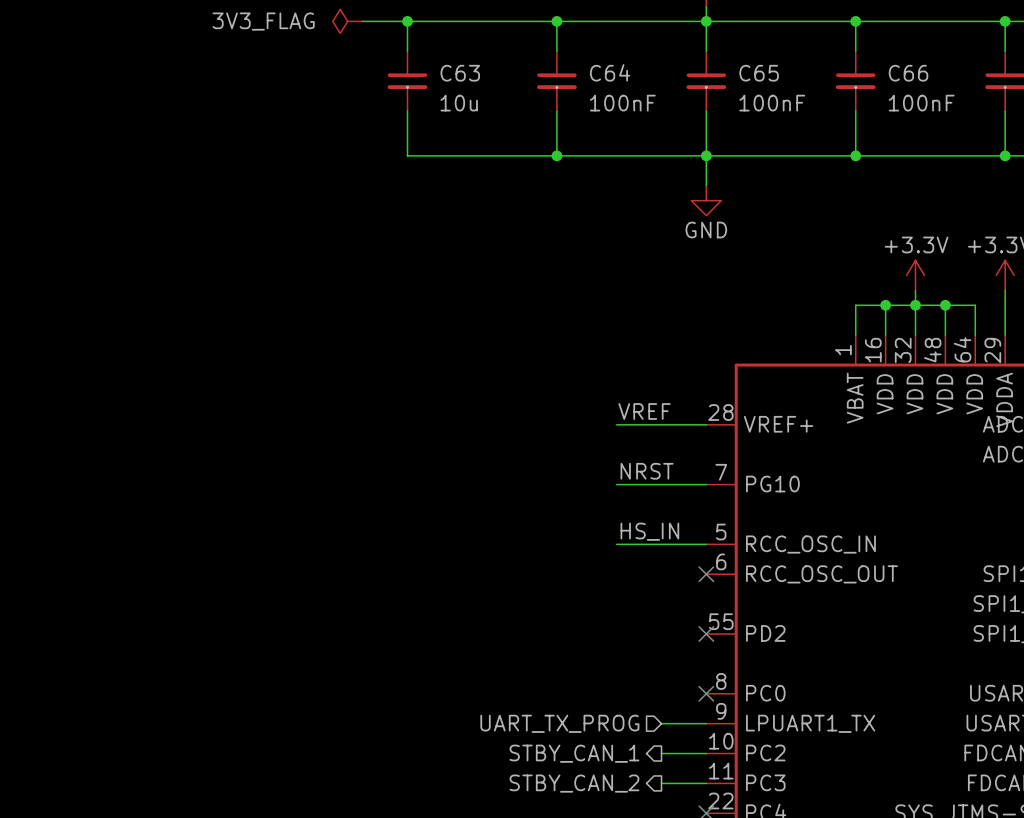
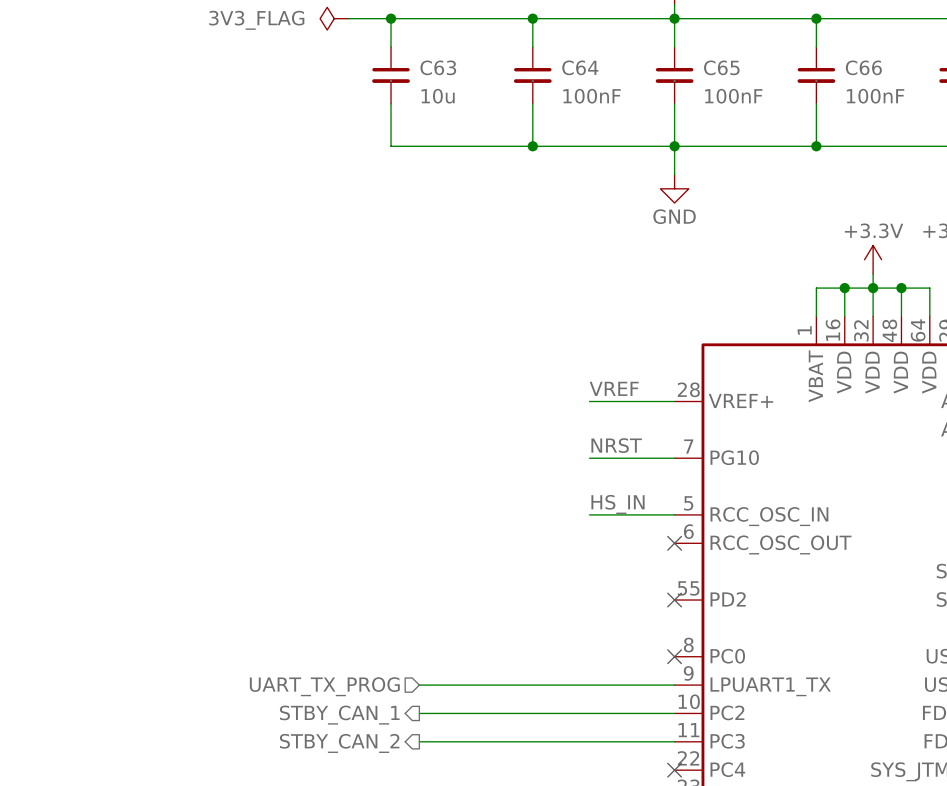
wire: none -> (419, 685) (632, 685)
hierarchical label position: UART_TX_PROG (559, 723) -> UART_TX_PROG (324, 686)
wire: none -> (419, 713) (632, 713)
hierarchical label position: STBY_CAN_1 (574, 753) -> STBY_CAN_1 (339, 715)
wire: none -> (419, 741) (632, 741)
hierarchical label position: STBY_CAN_2 (574, 783) -> STBY_CAN_2 (339, 743)

